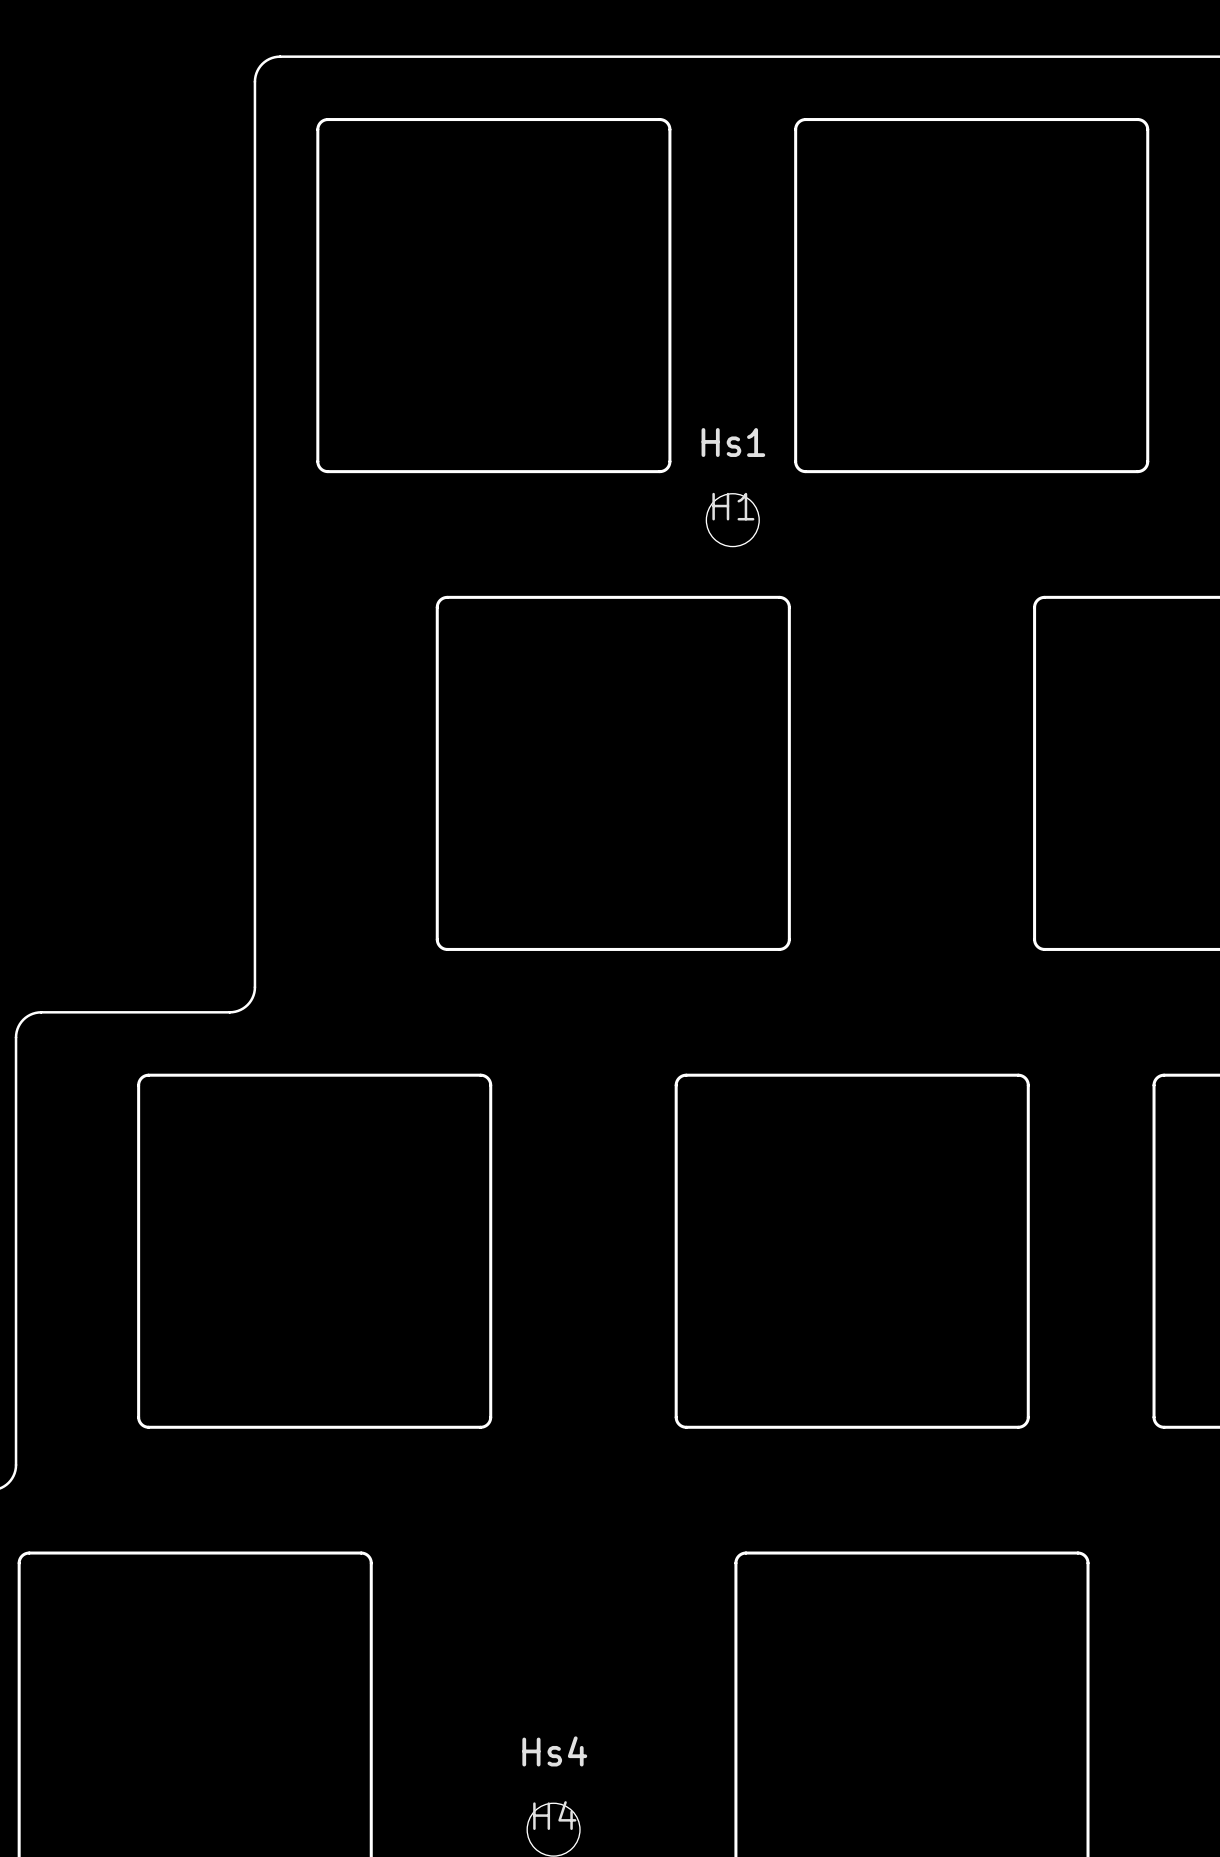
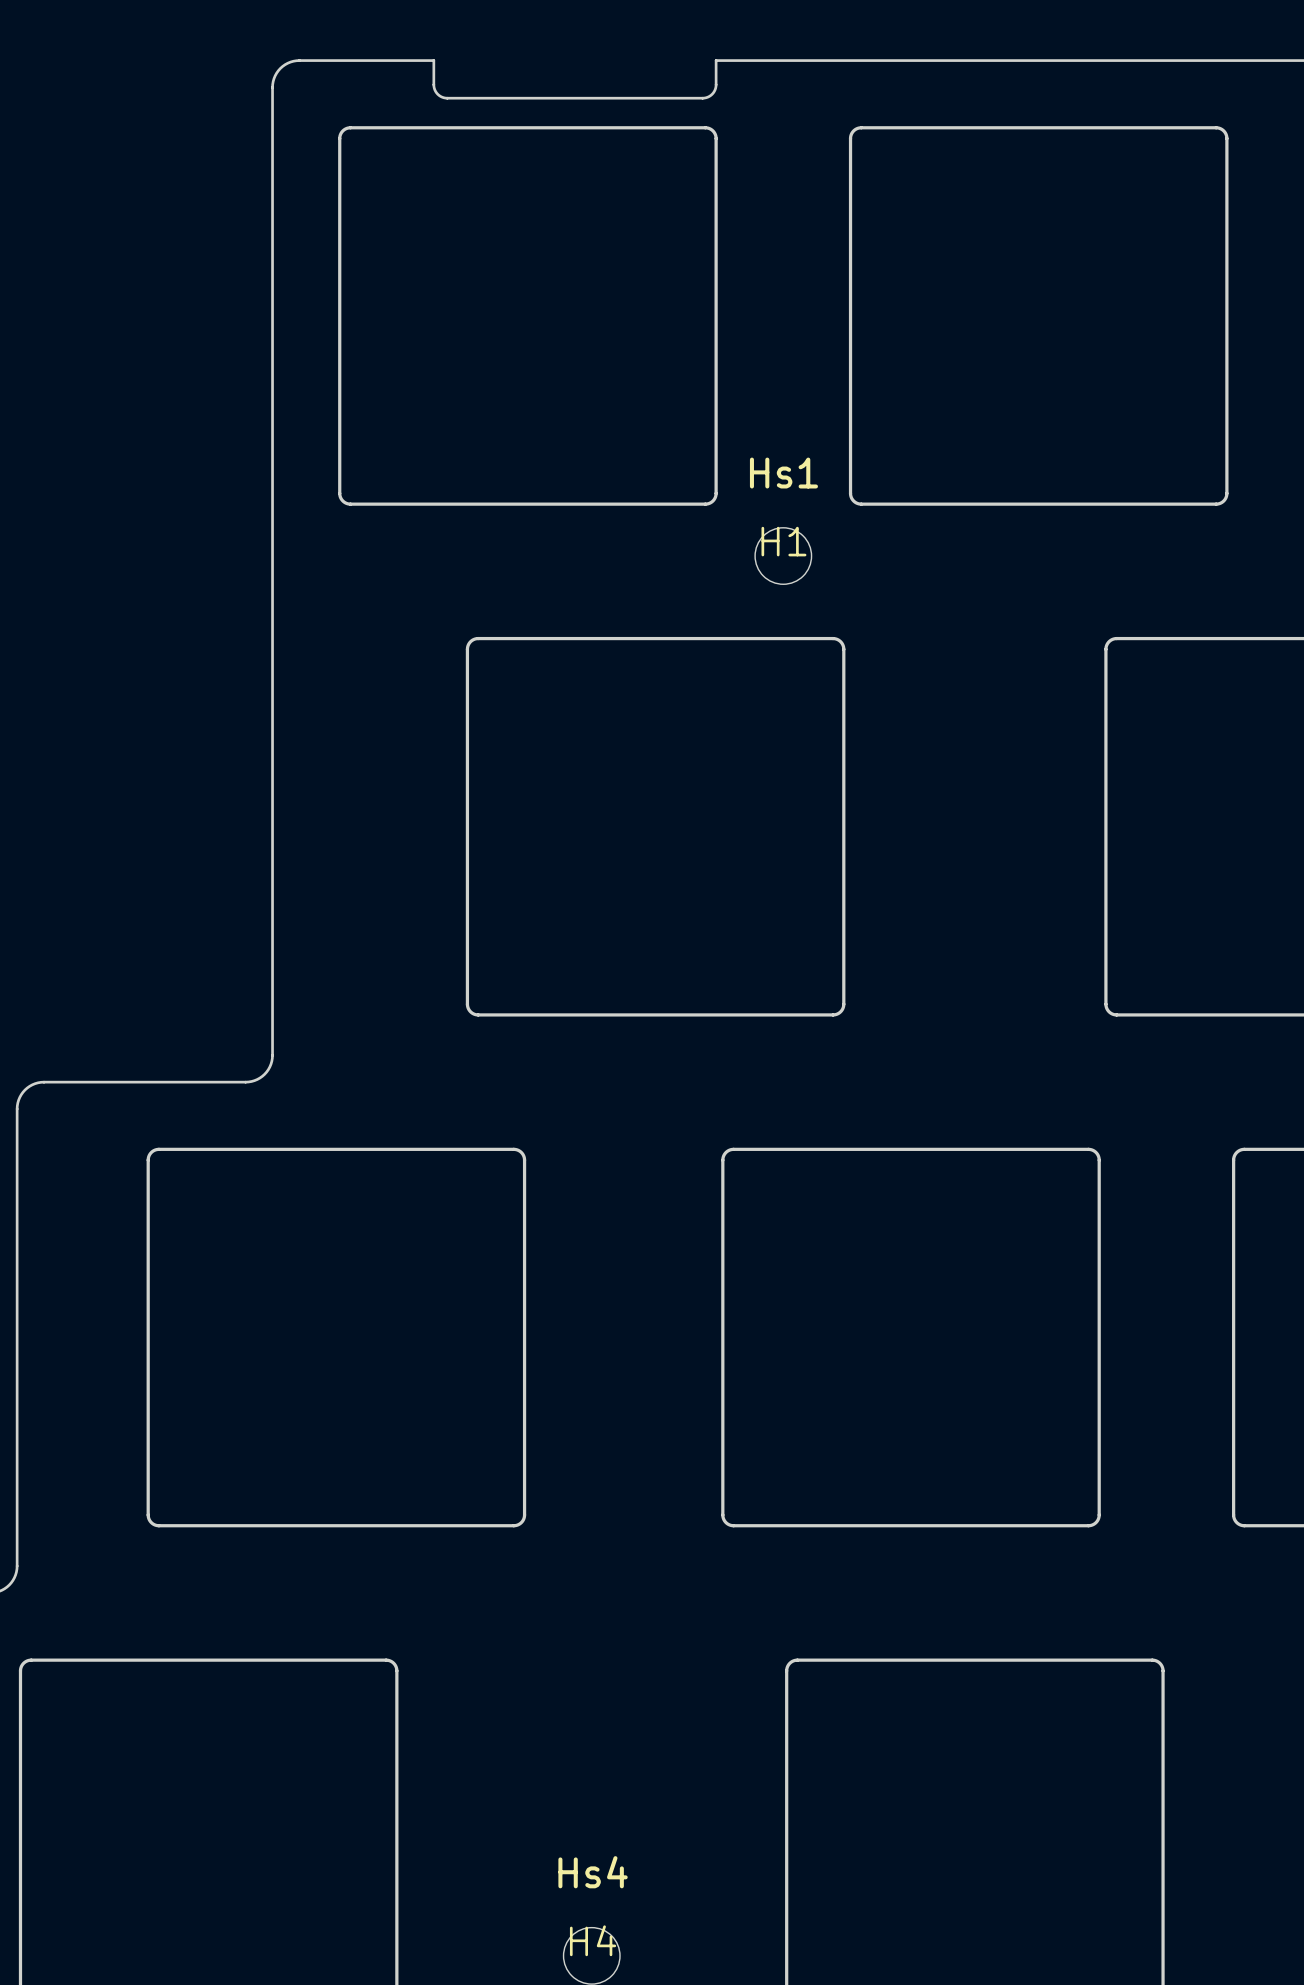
board edge: (405, 56) (669, 56) -> (433, 60) (434, 89) (440, 96) (447, 98) (704, 98) (712, 94) (715, 88) (716, 60)

